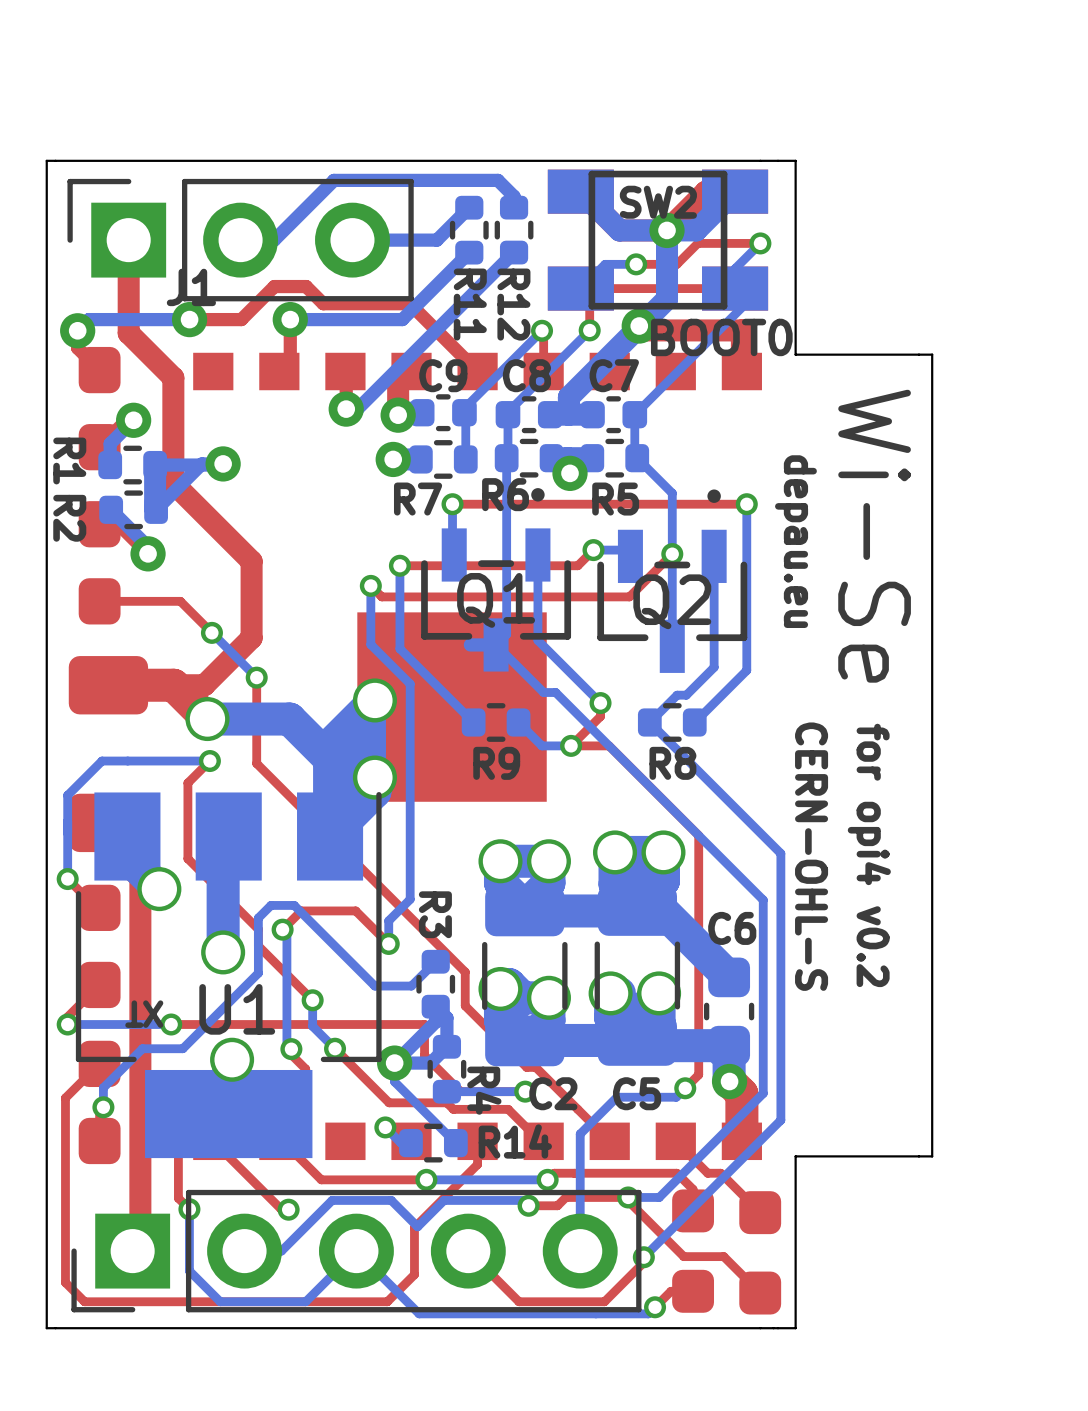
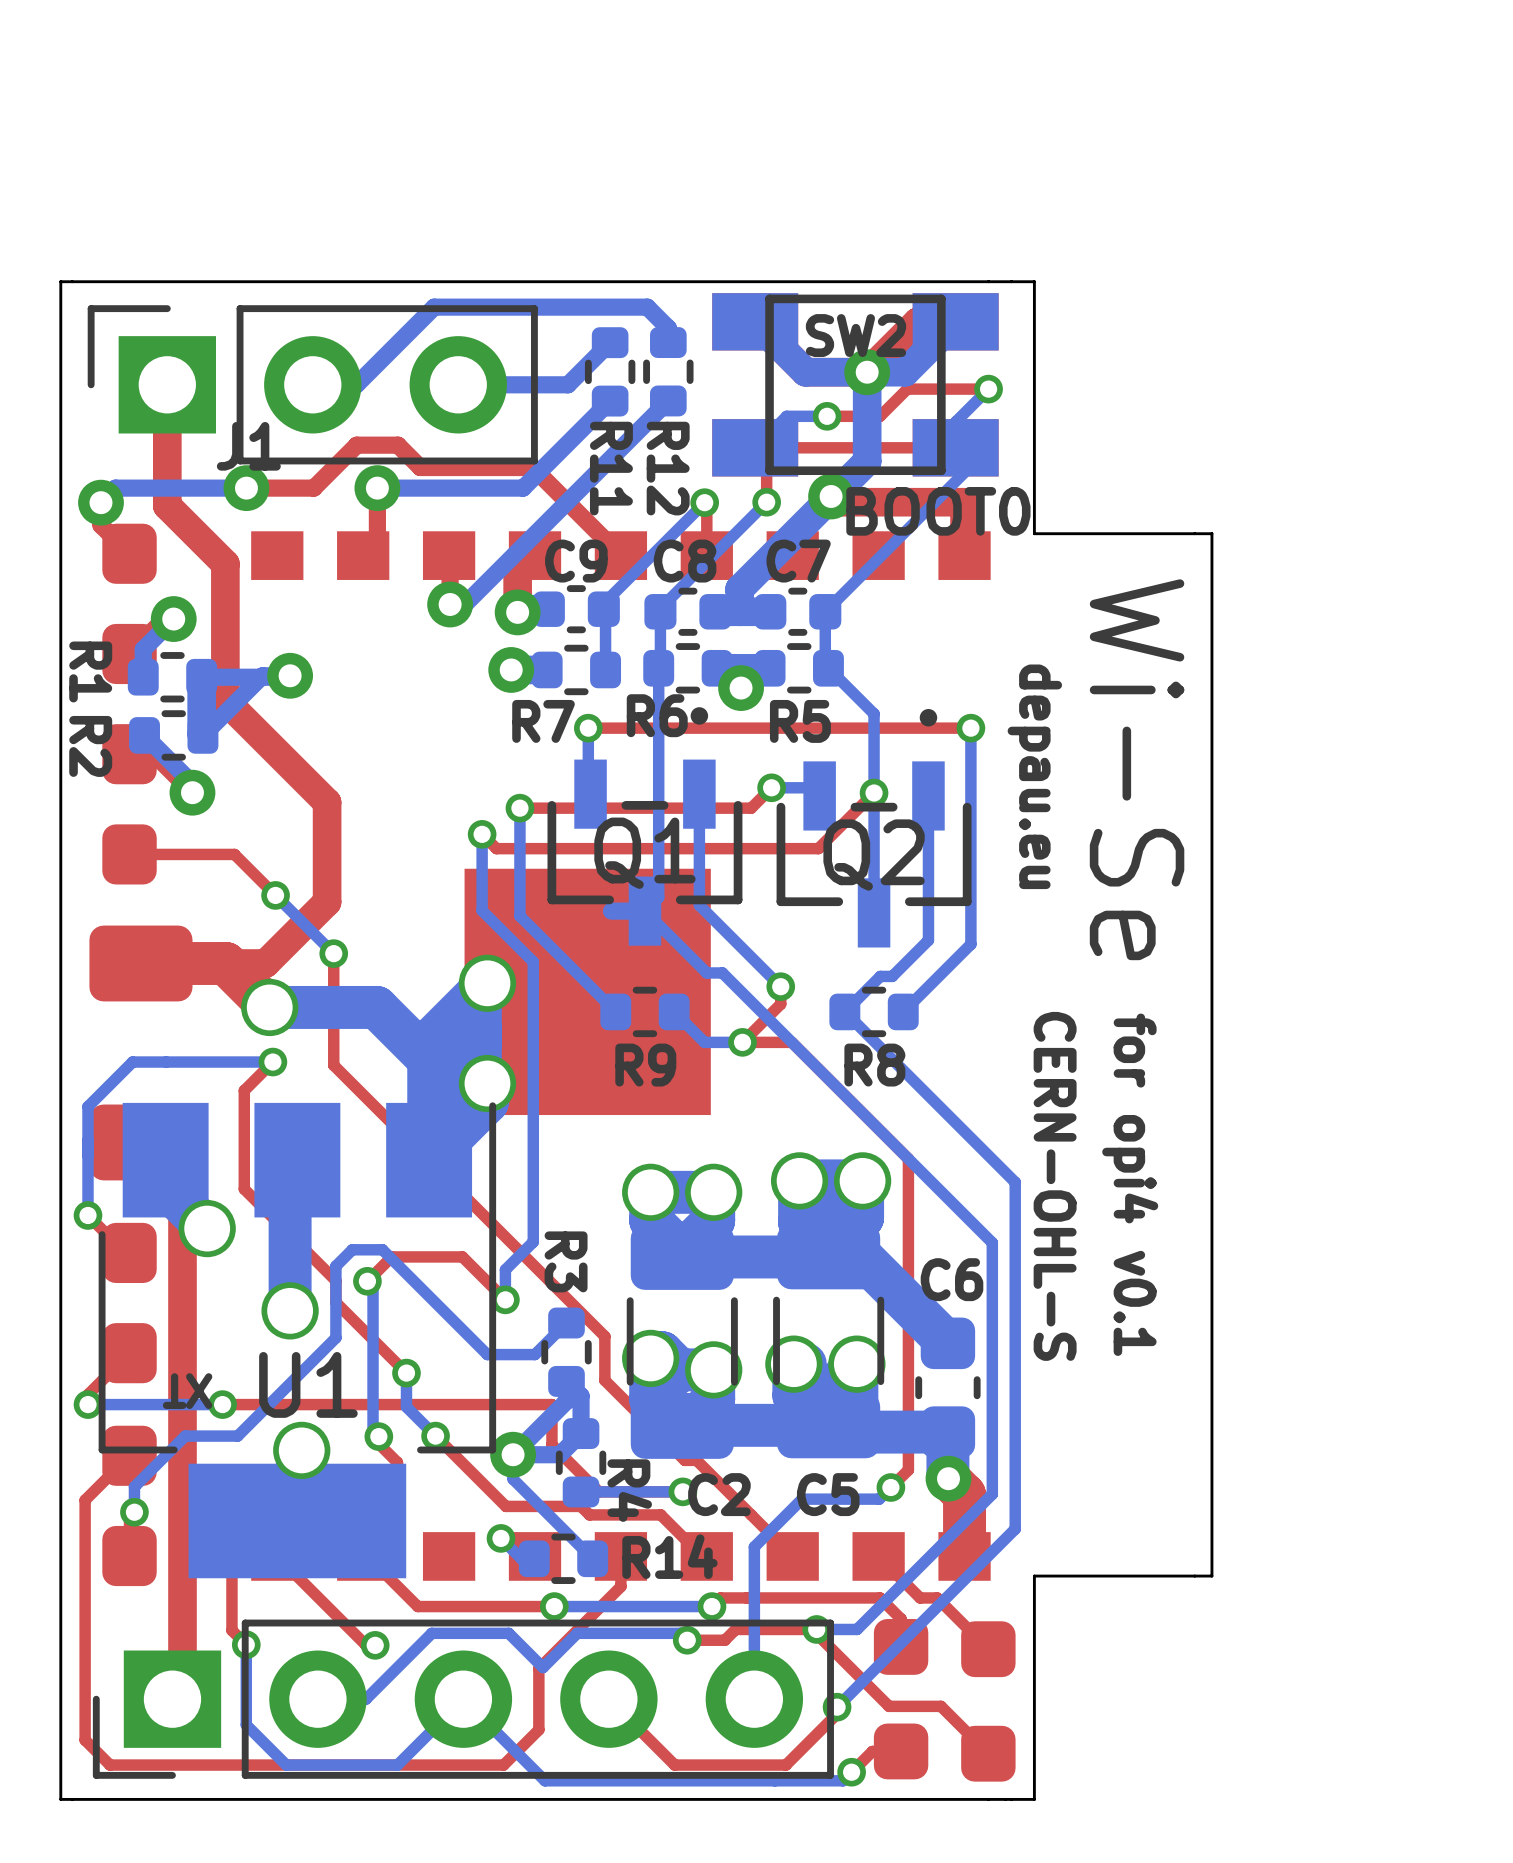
text: for opi4 v0.2 (869, 855) -> for opi4 v0.1 (1130, 1184)

